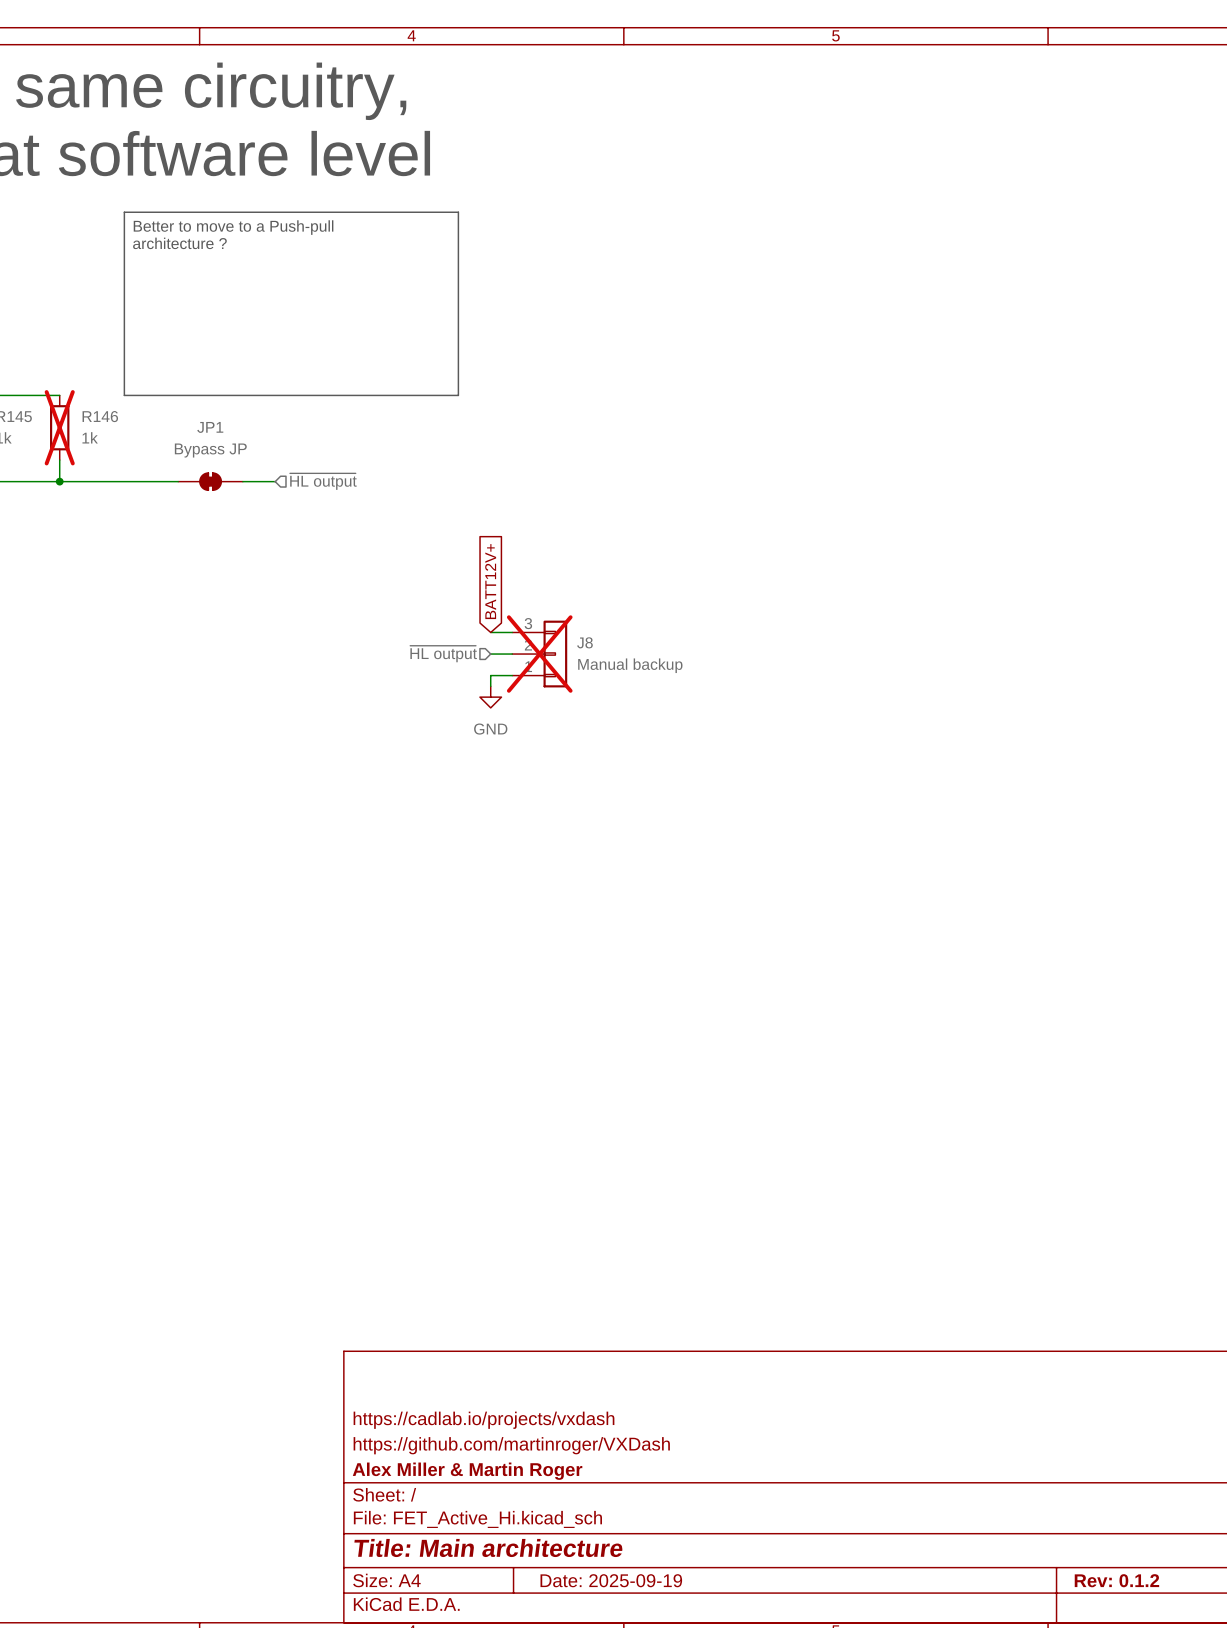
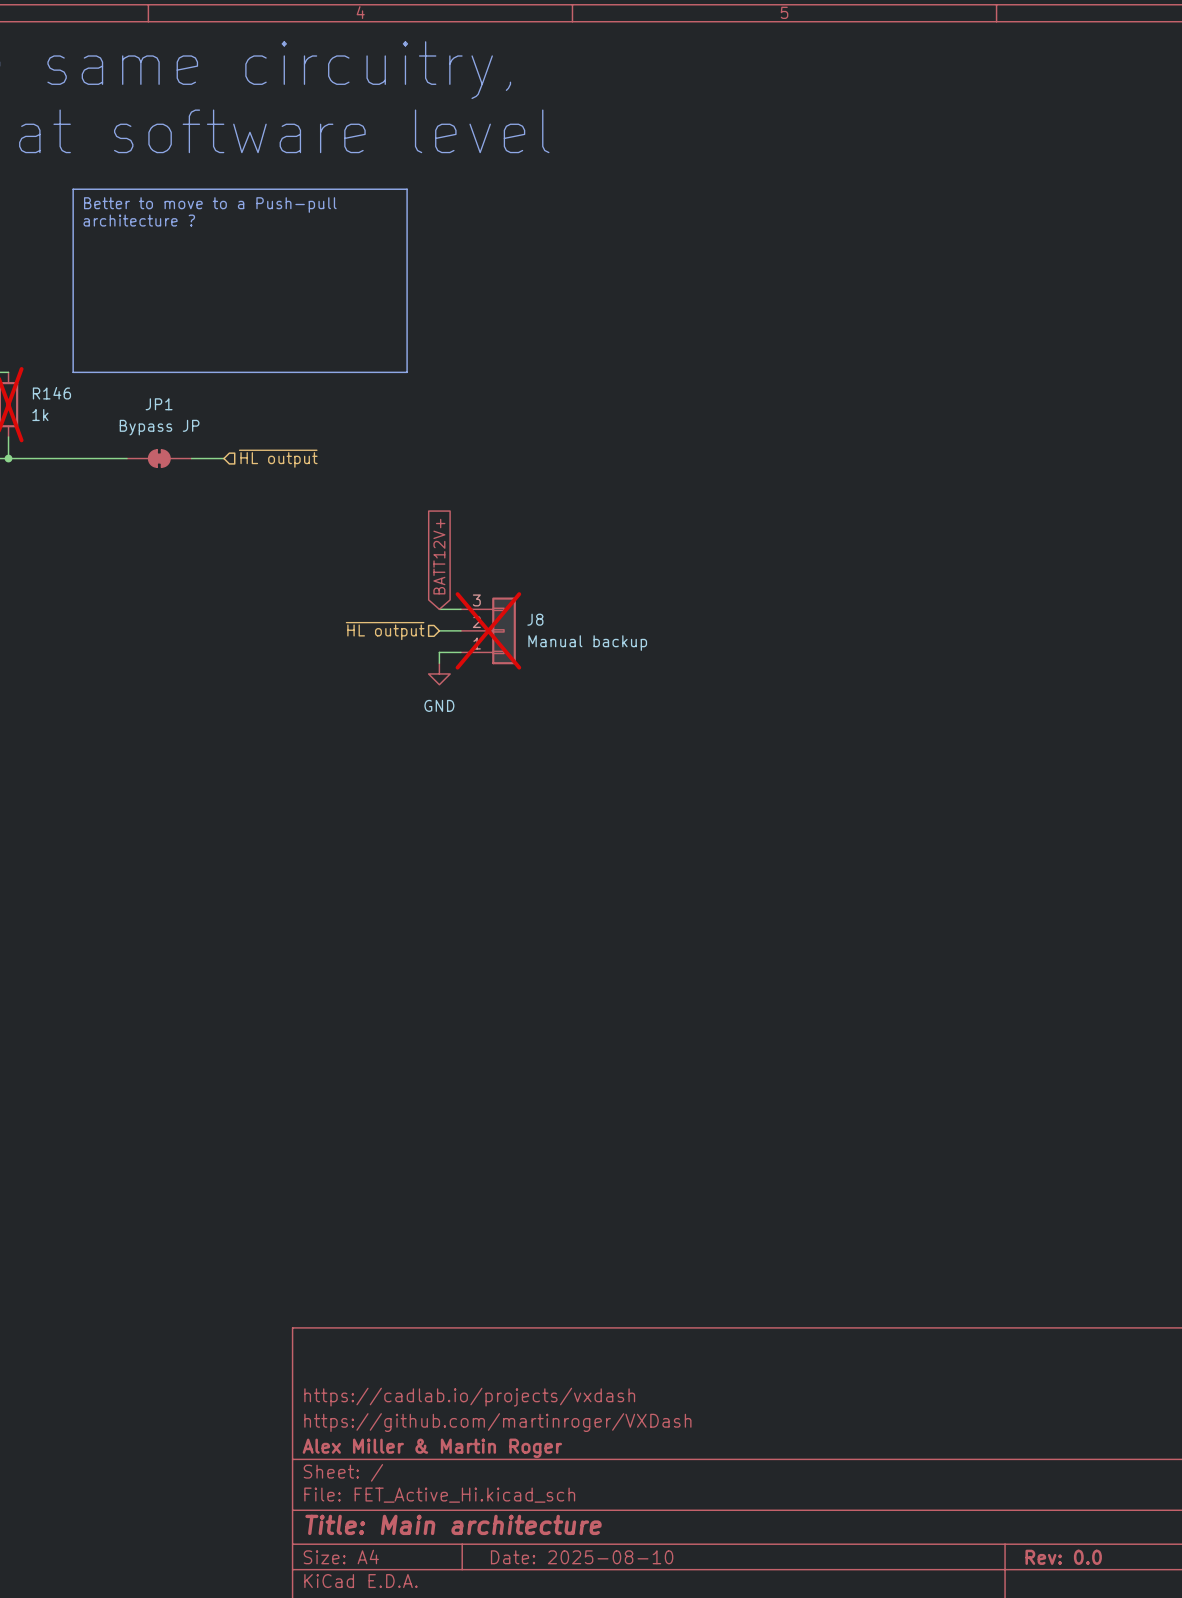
title block: Date: 2025-09-19 (611, 1580) -> Date: 2025-08-10 (582, 1557)
title block: Rev: 0.1.2 (1116, 1580) -> Rev: 0.0 (1063, 1557)

